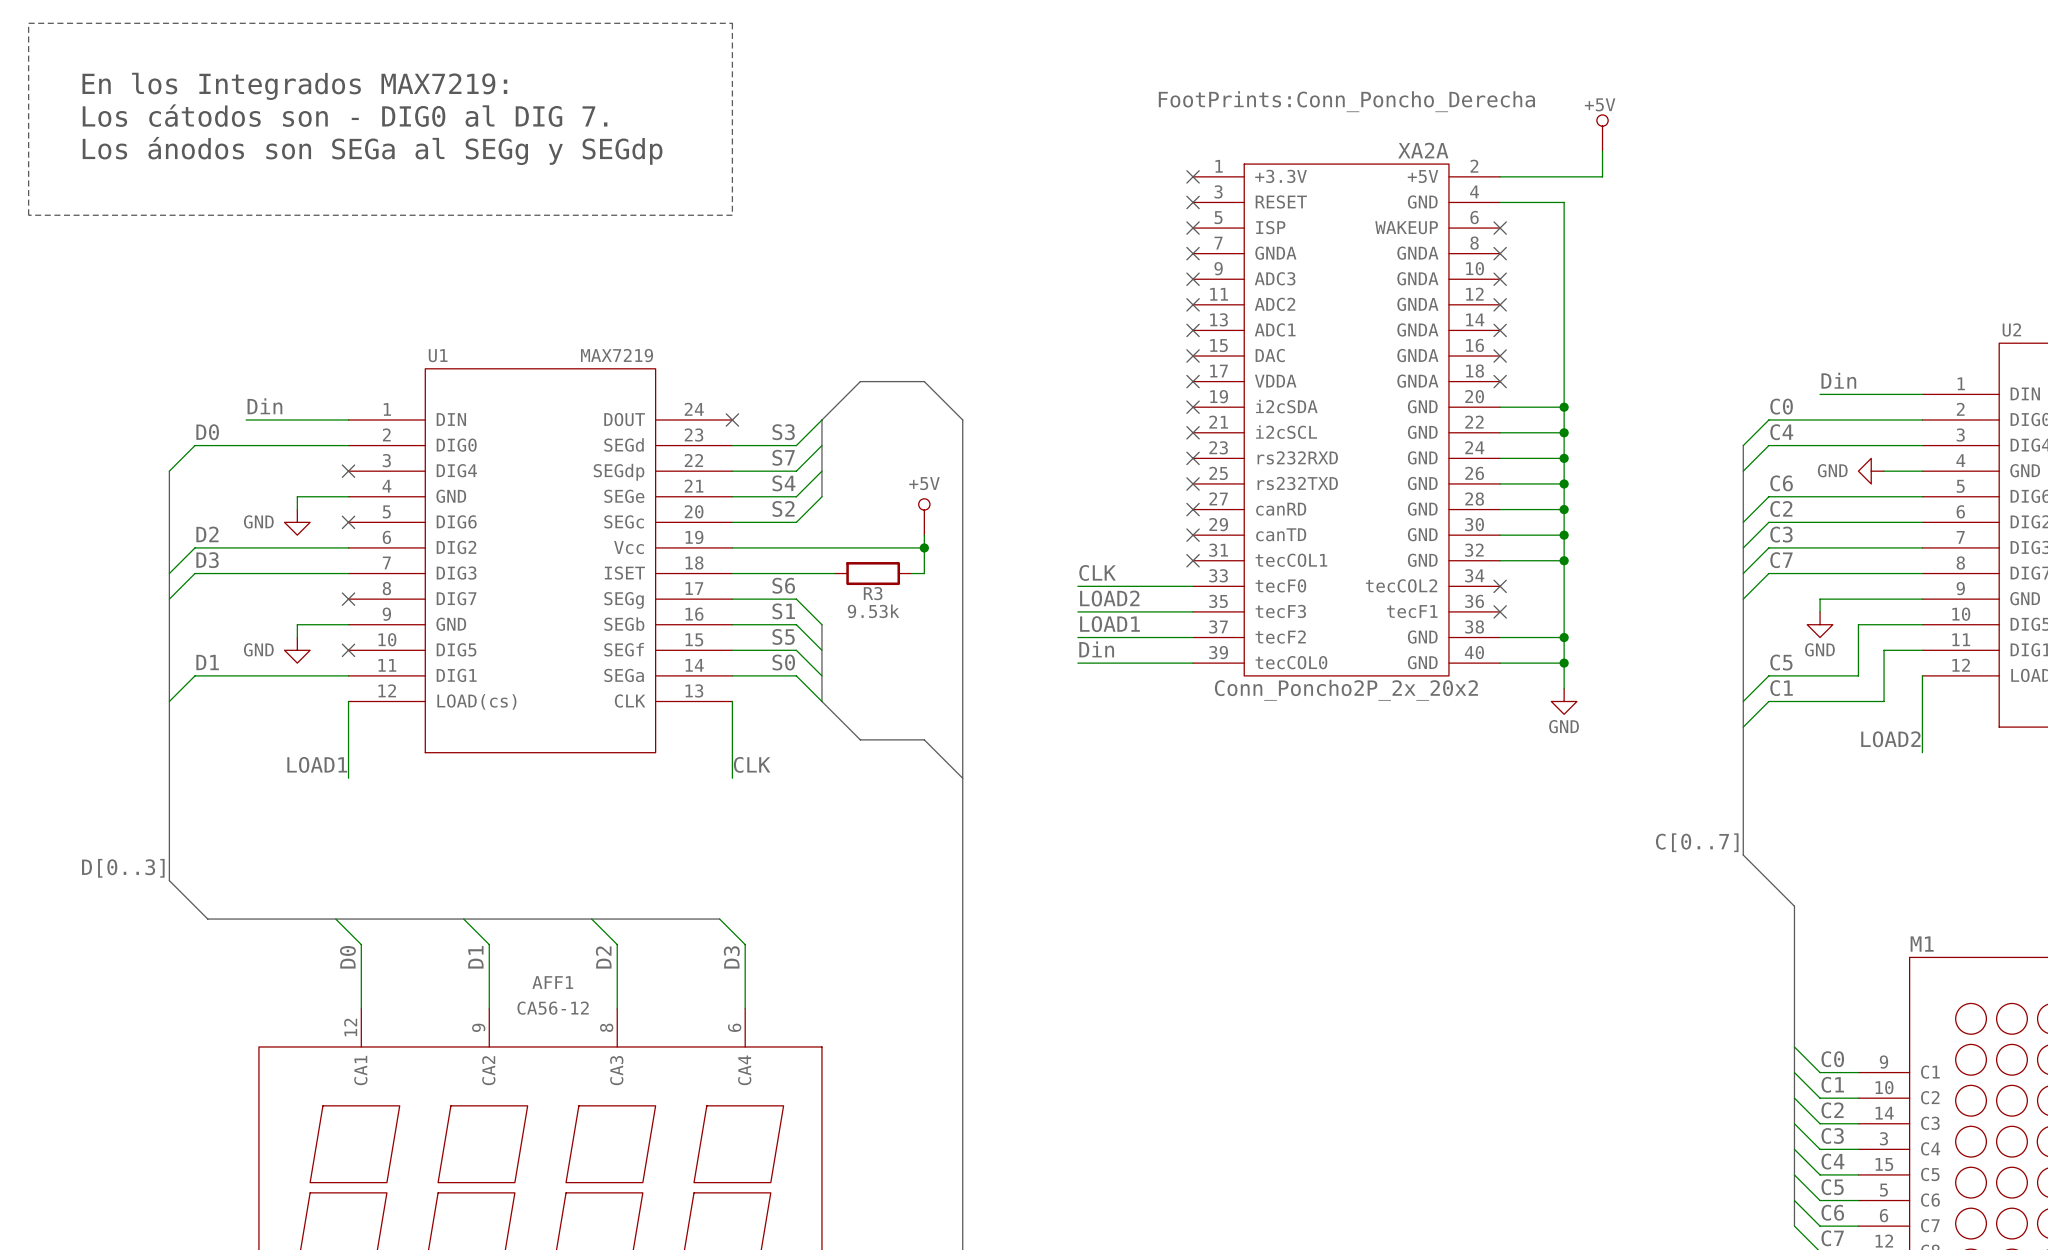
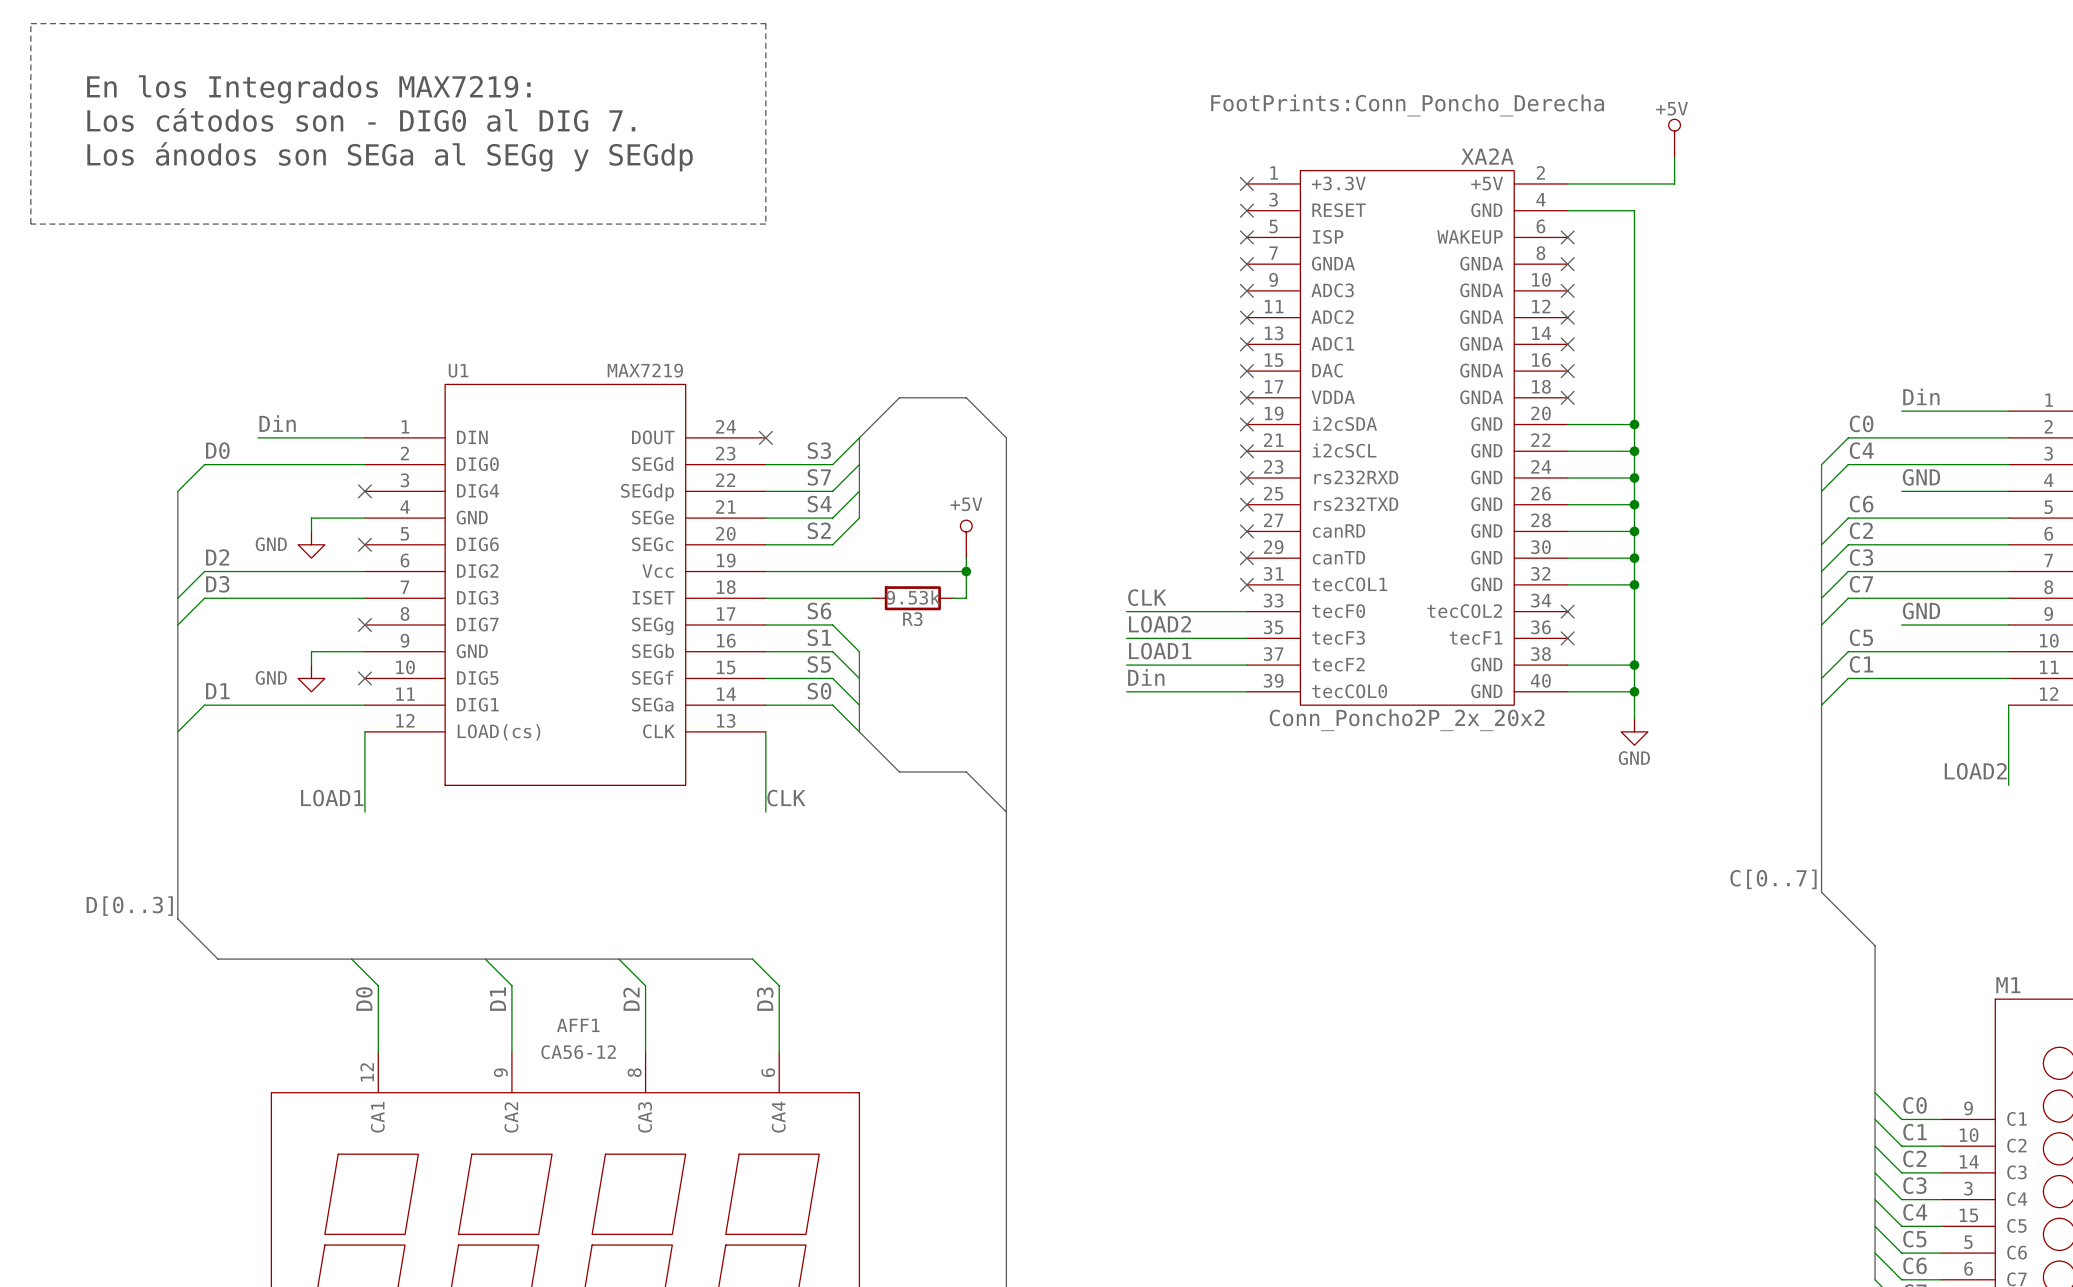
label: none -> GND (1921, 477)
wire: none -> (1901, 491) (1968, 491)
power symbol: GND (1871, 471) -> none
label: none -> GND (1921, 611)
wire: (1820, 599) (1820, 611) -> none
R3 value position: 9.53k (873, 611) -> 9.53k (913, 597)
power symbol: GND (1820, 624) -> none
wire: (1858, 624) (1858, 675) (1768, 675) (1743, 701) -> (1941, 651) (1848, 651) (1821, 678)
wire: (1884, 650) (1884, 701) (1768, 701) (1743, 727) -> (1968, 678) (1848, 678) (1821, 705)
label position: C5 (1781, 662) -> C5 (1861, 637)
label position: C1 (1781, 688) -> C1 (1861, 664)

